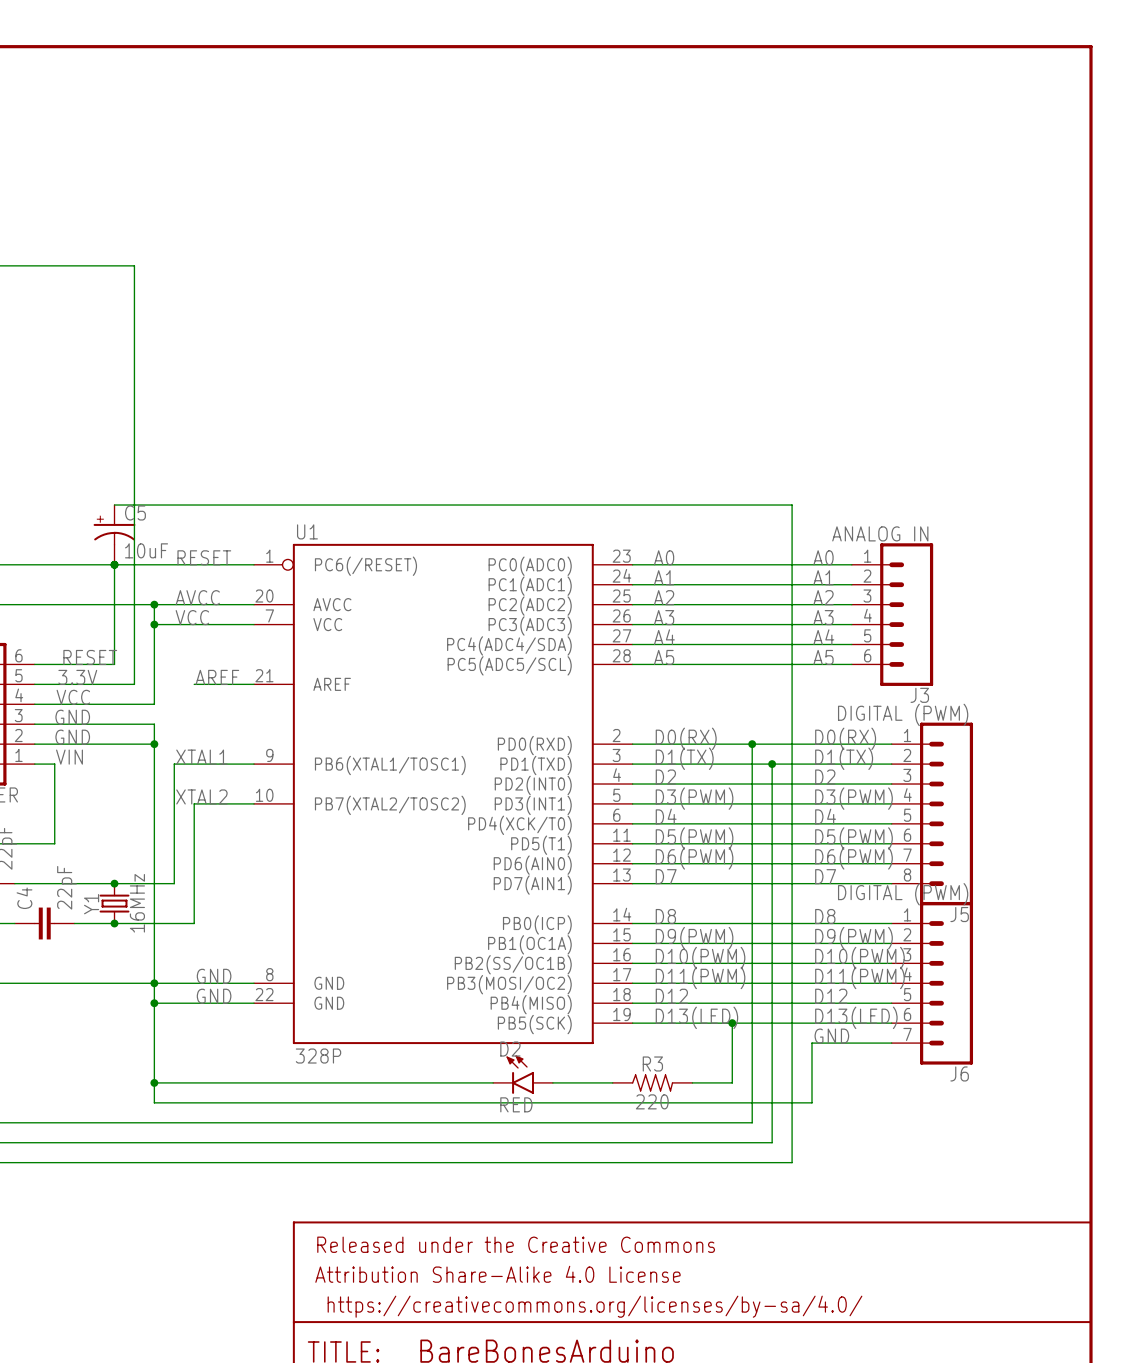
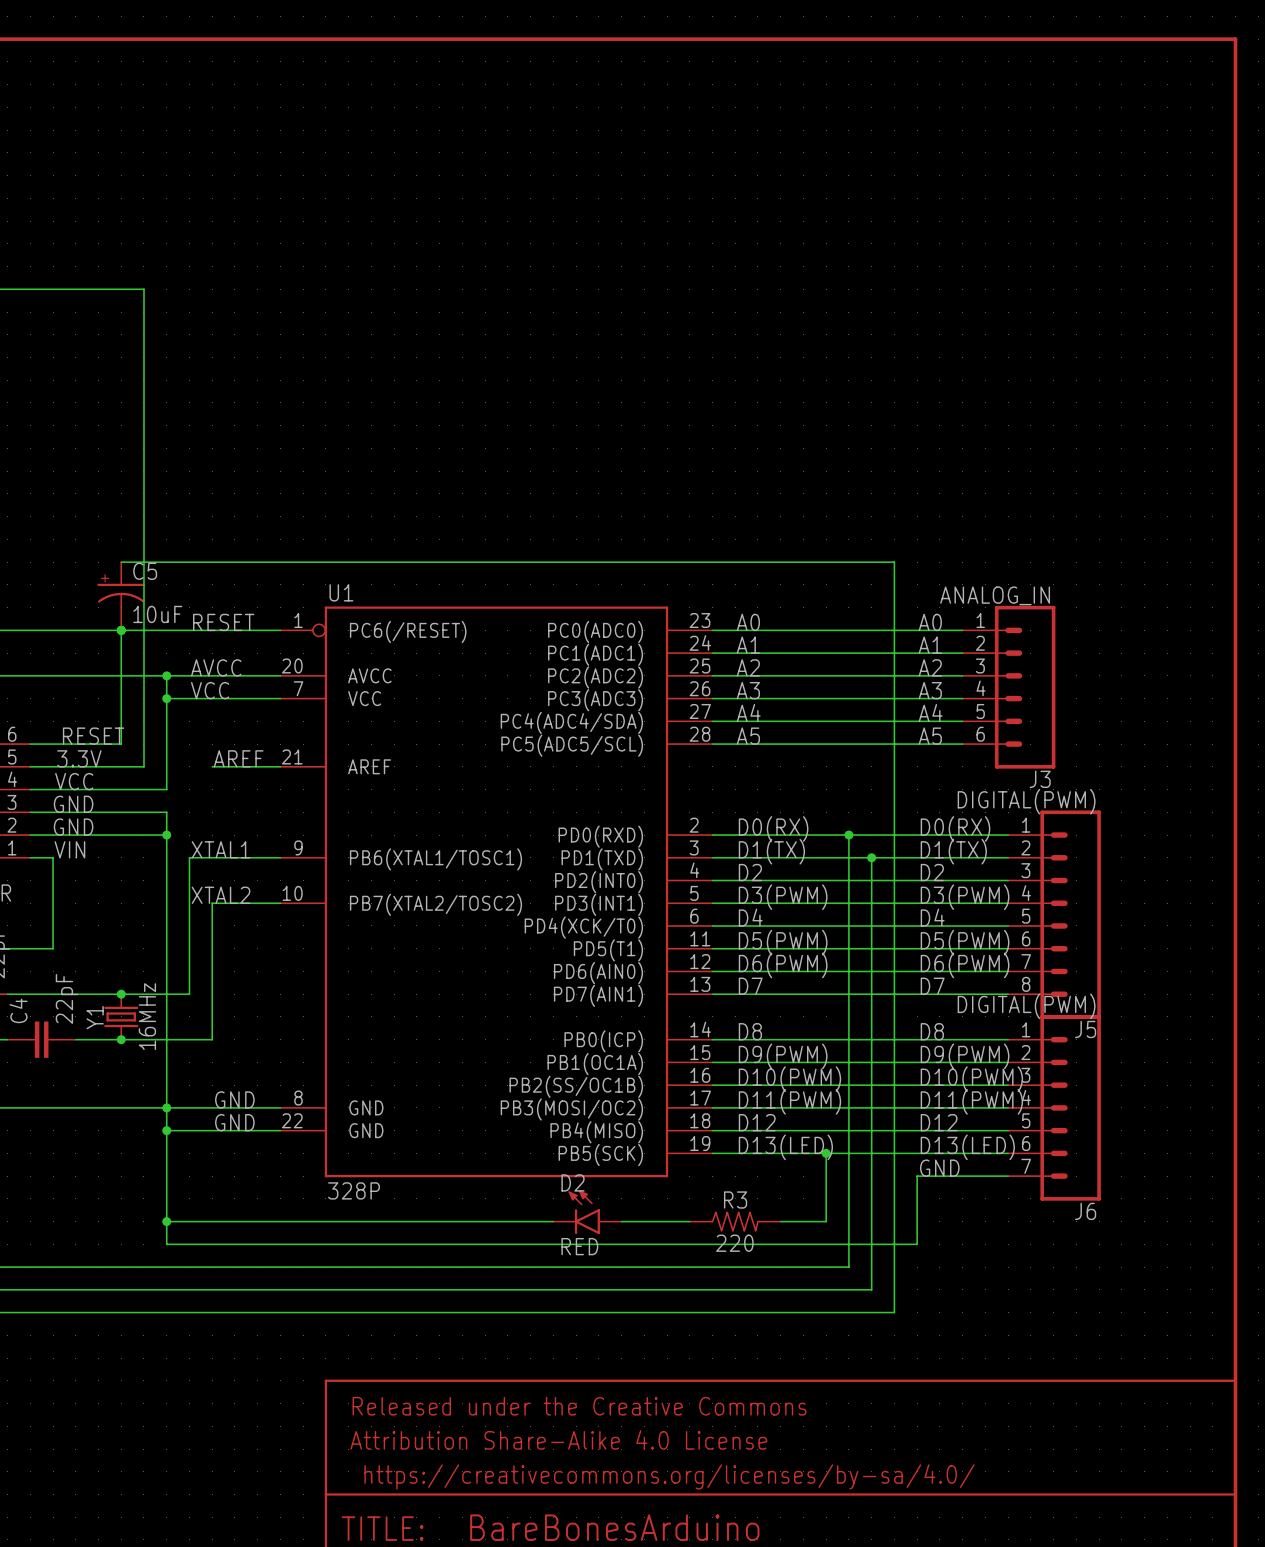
J3 value: ANALOG IN (880, 533) -> ANALOG_IN (995, 595)
J5 value: DIGITAL (PWM) (903, 714) -> DIGITAL(PWM) (1026, 801)
J6 value: DIGITAL (PWM) (903, 894) -> DIGITAL(PWM) (1026, 1006)

